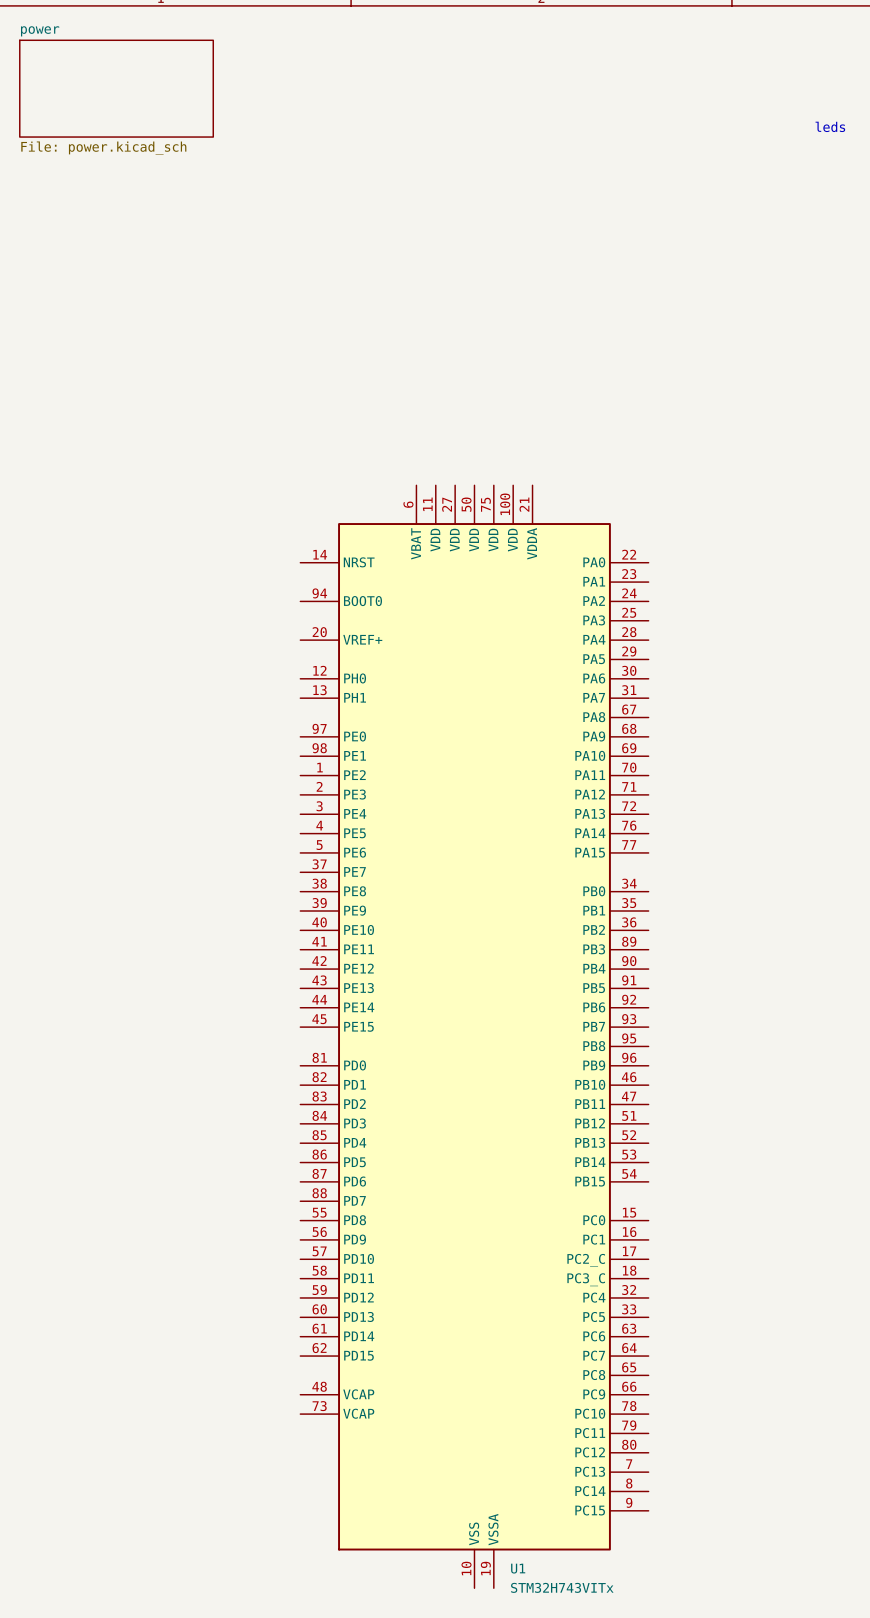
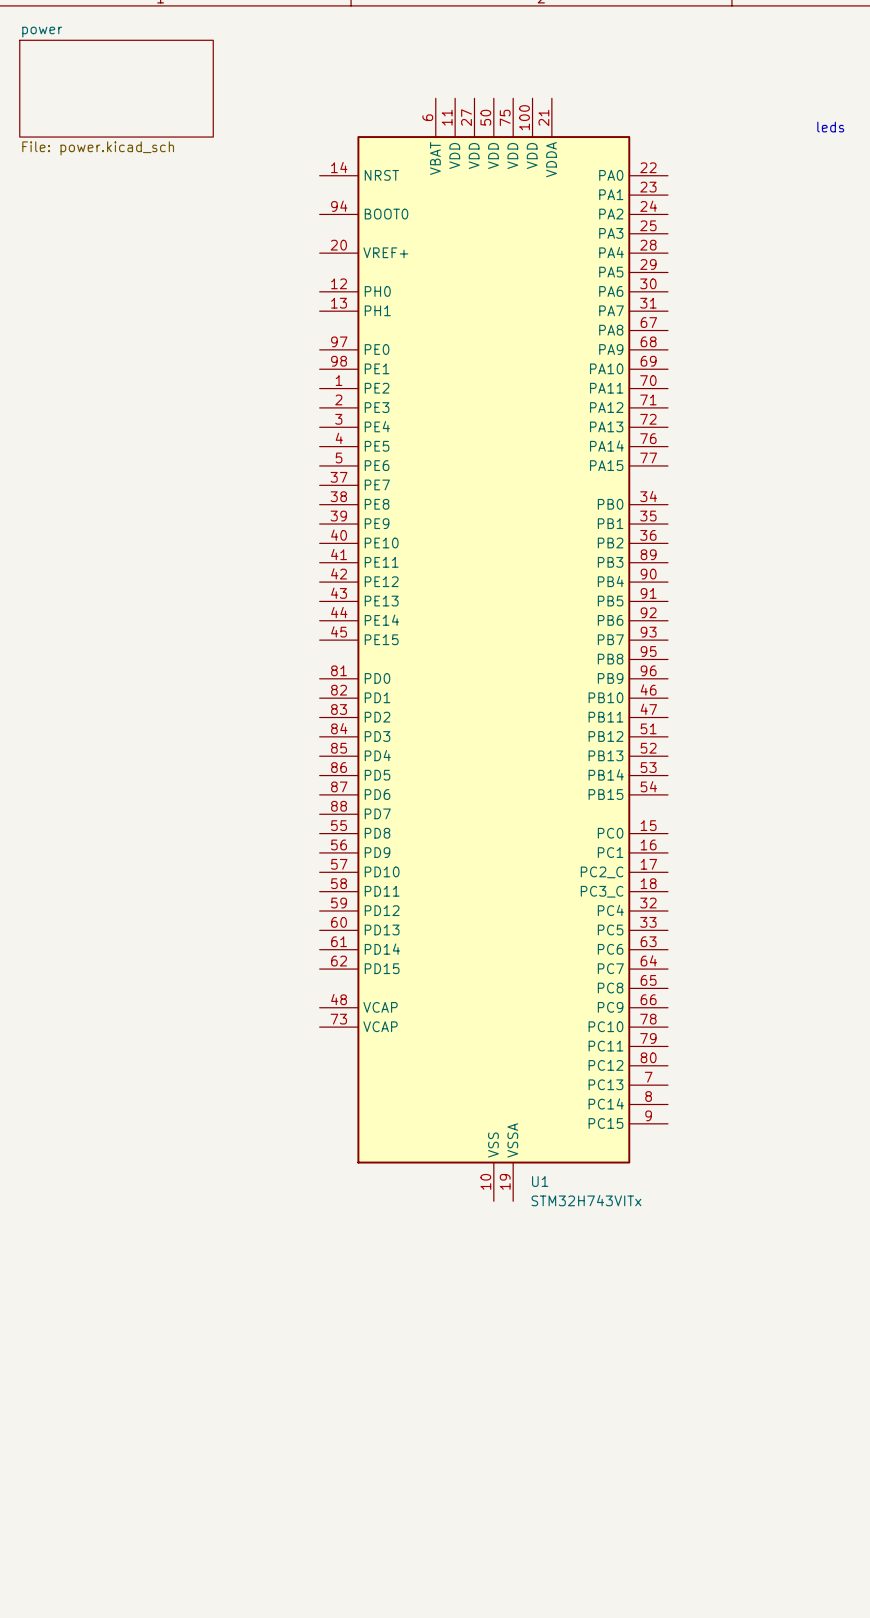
U1 position: (474, 1036) -> (493, 649)

